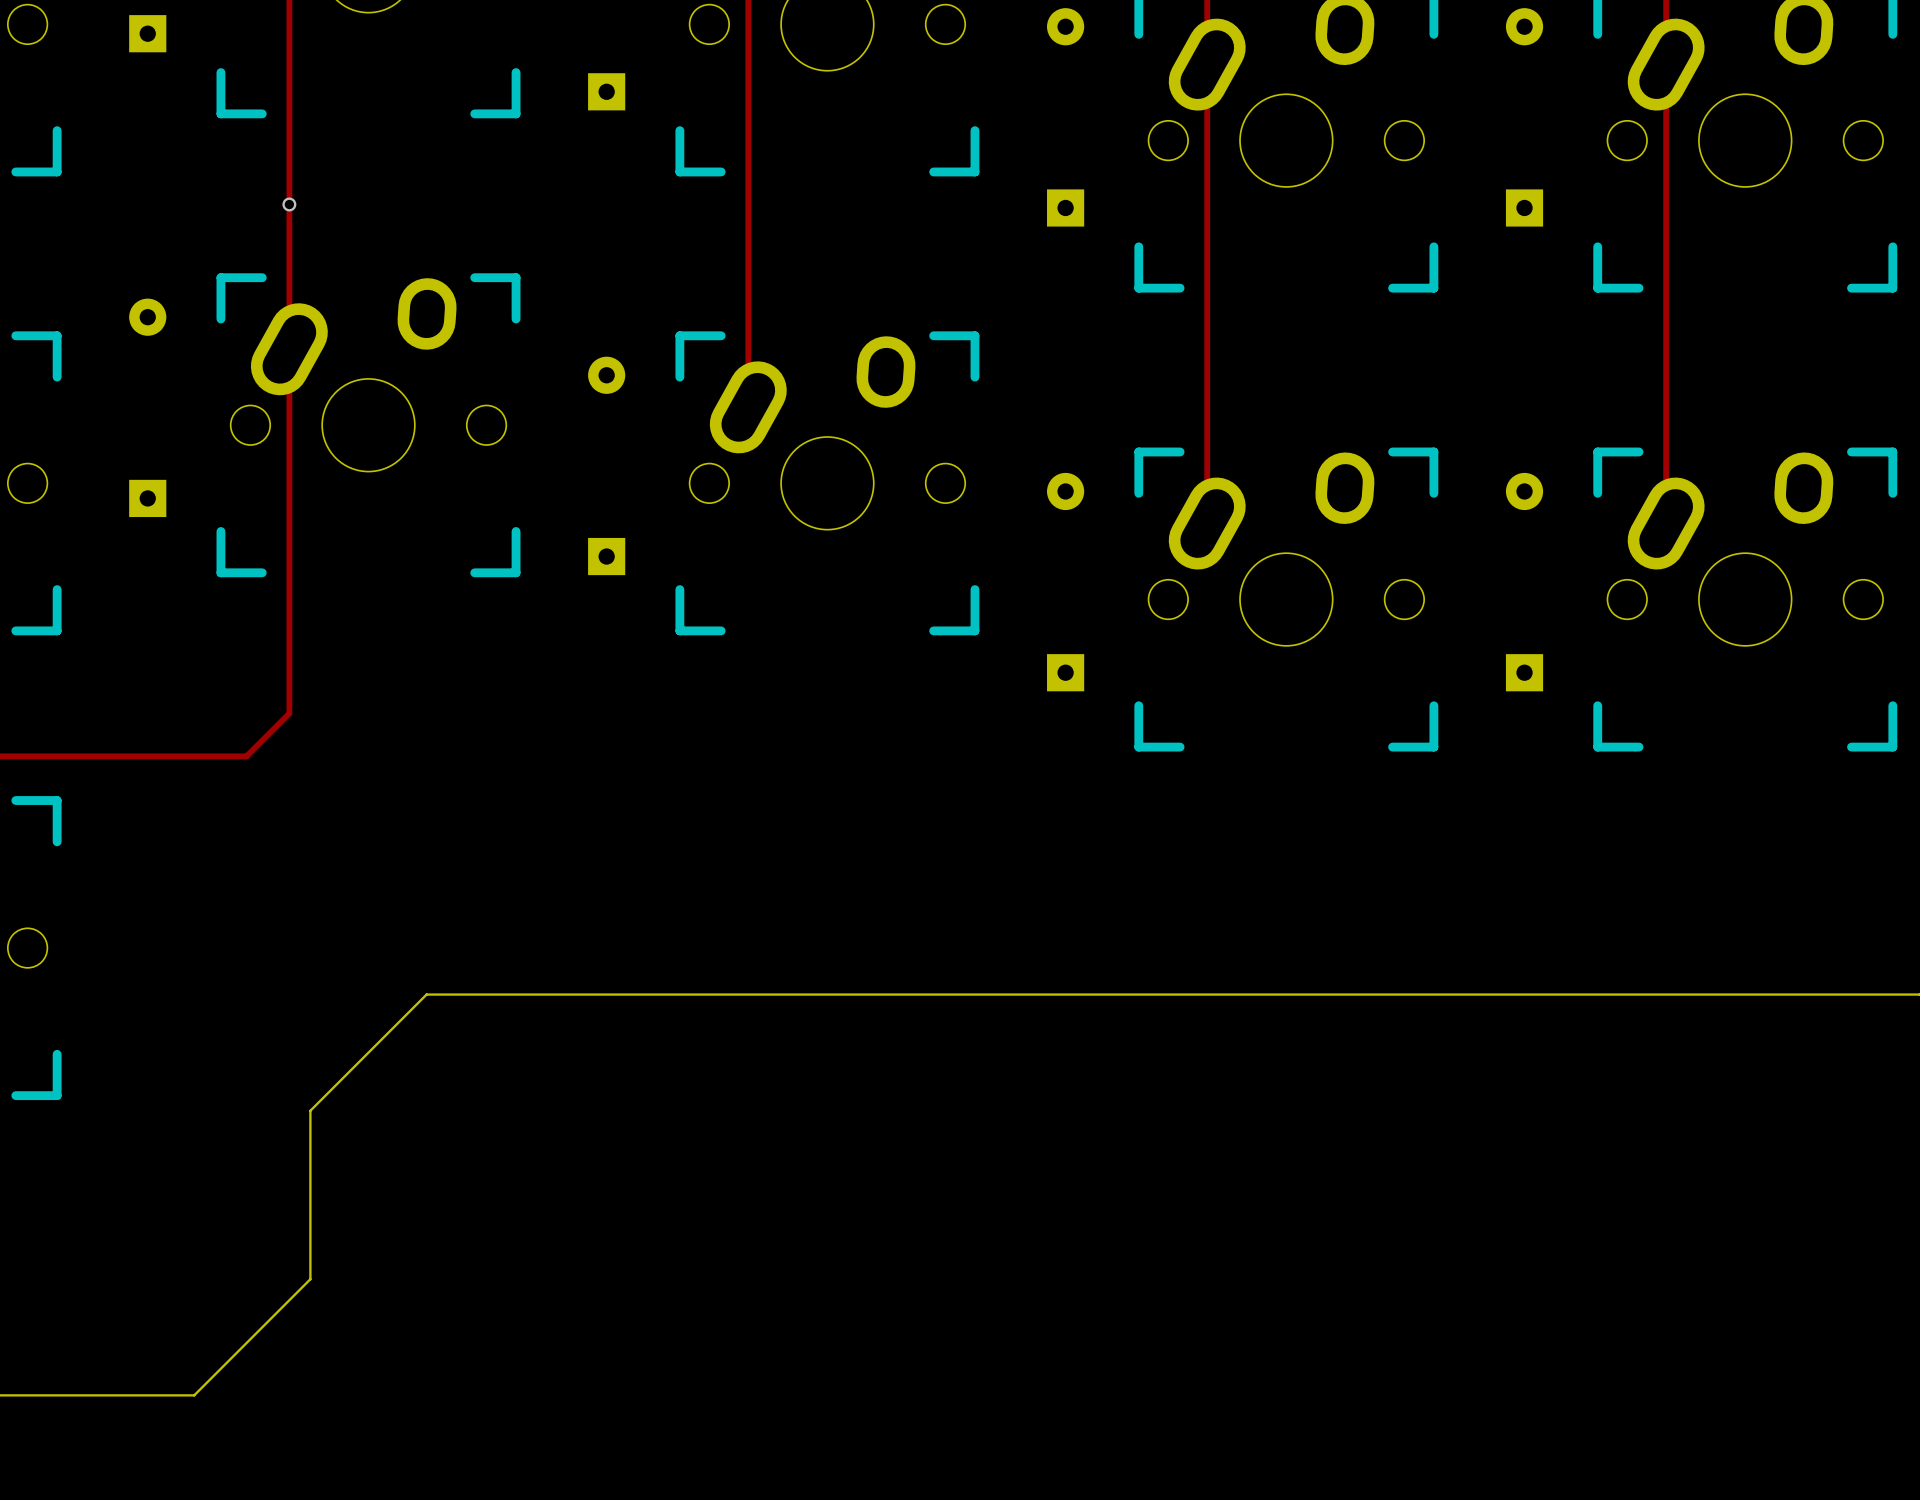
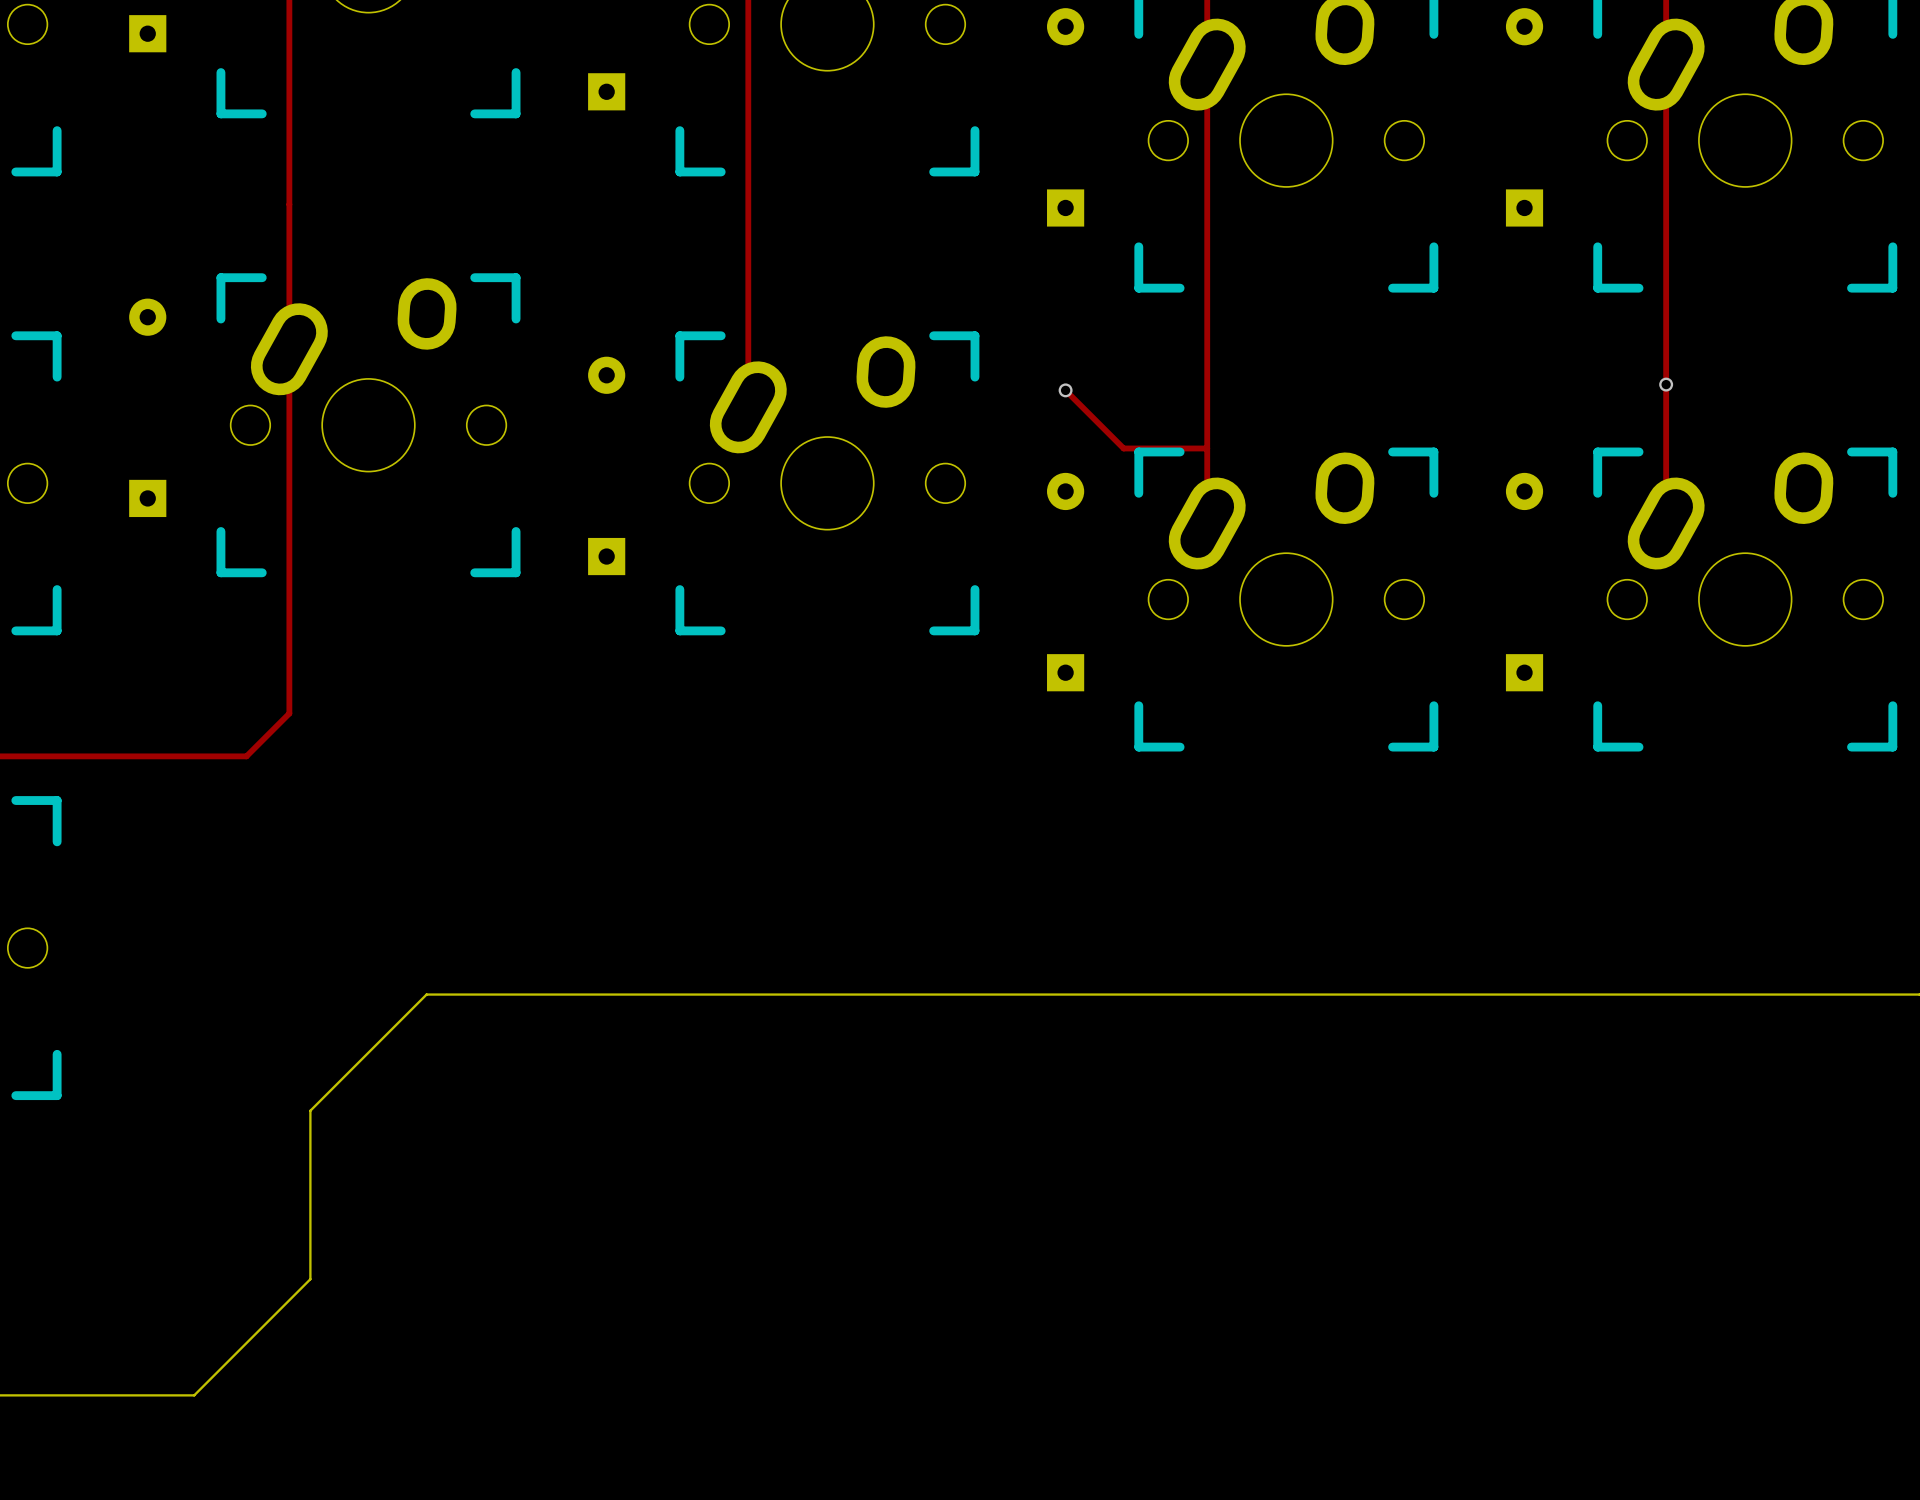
via: (289, 204) -> none
via: none -> (1666, 384)
track: none -> (1065, 390) (1123, 448) (1207, 448)
via: none -> (1065, 390)

